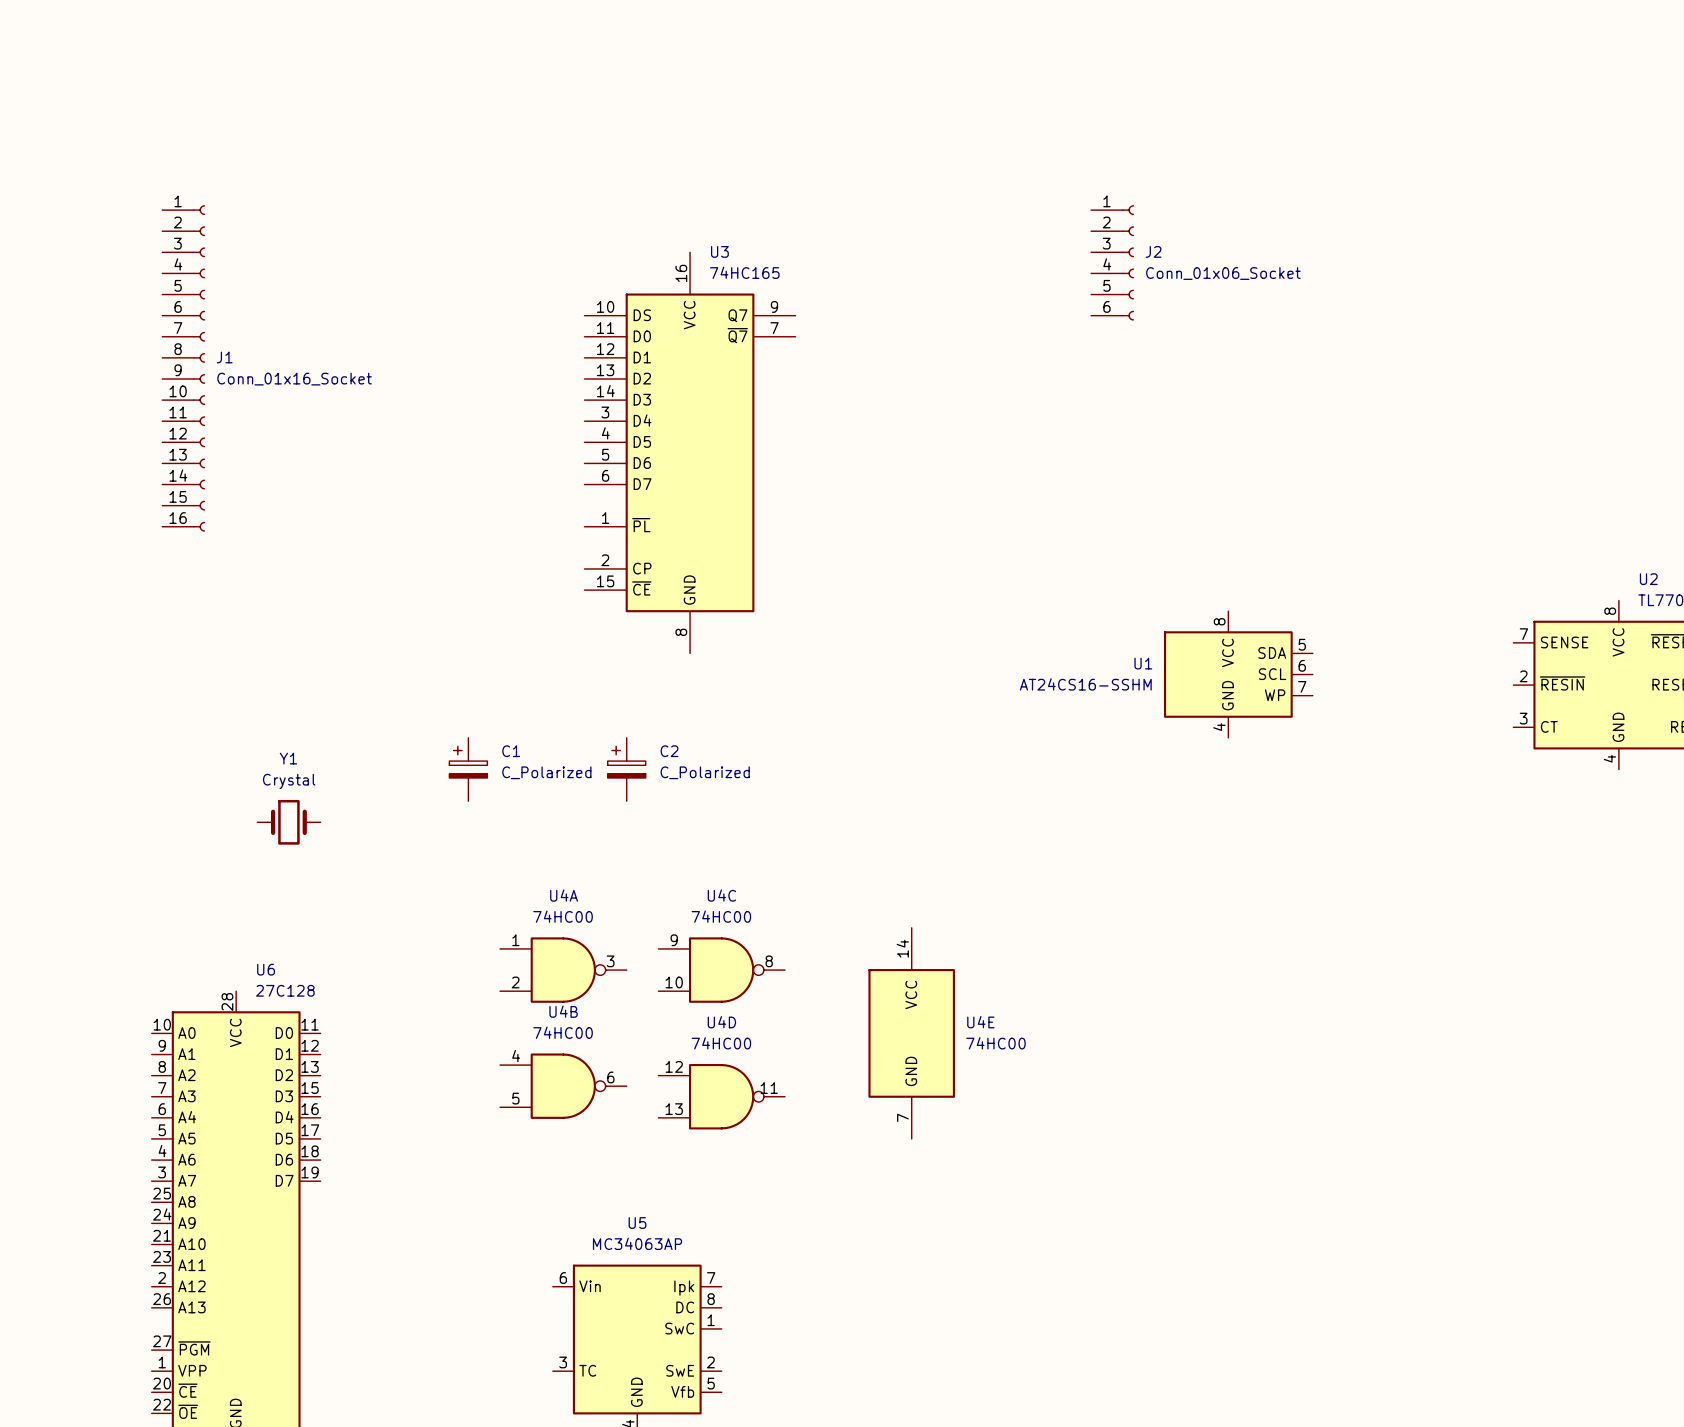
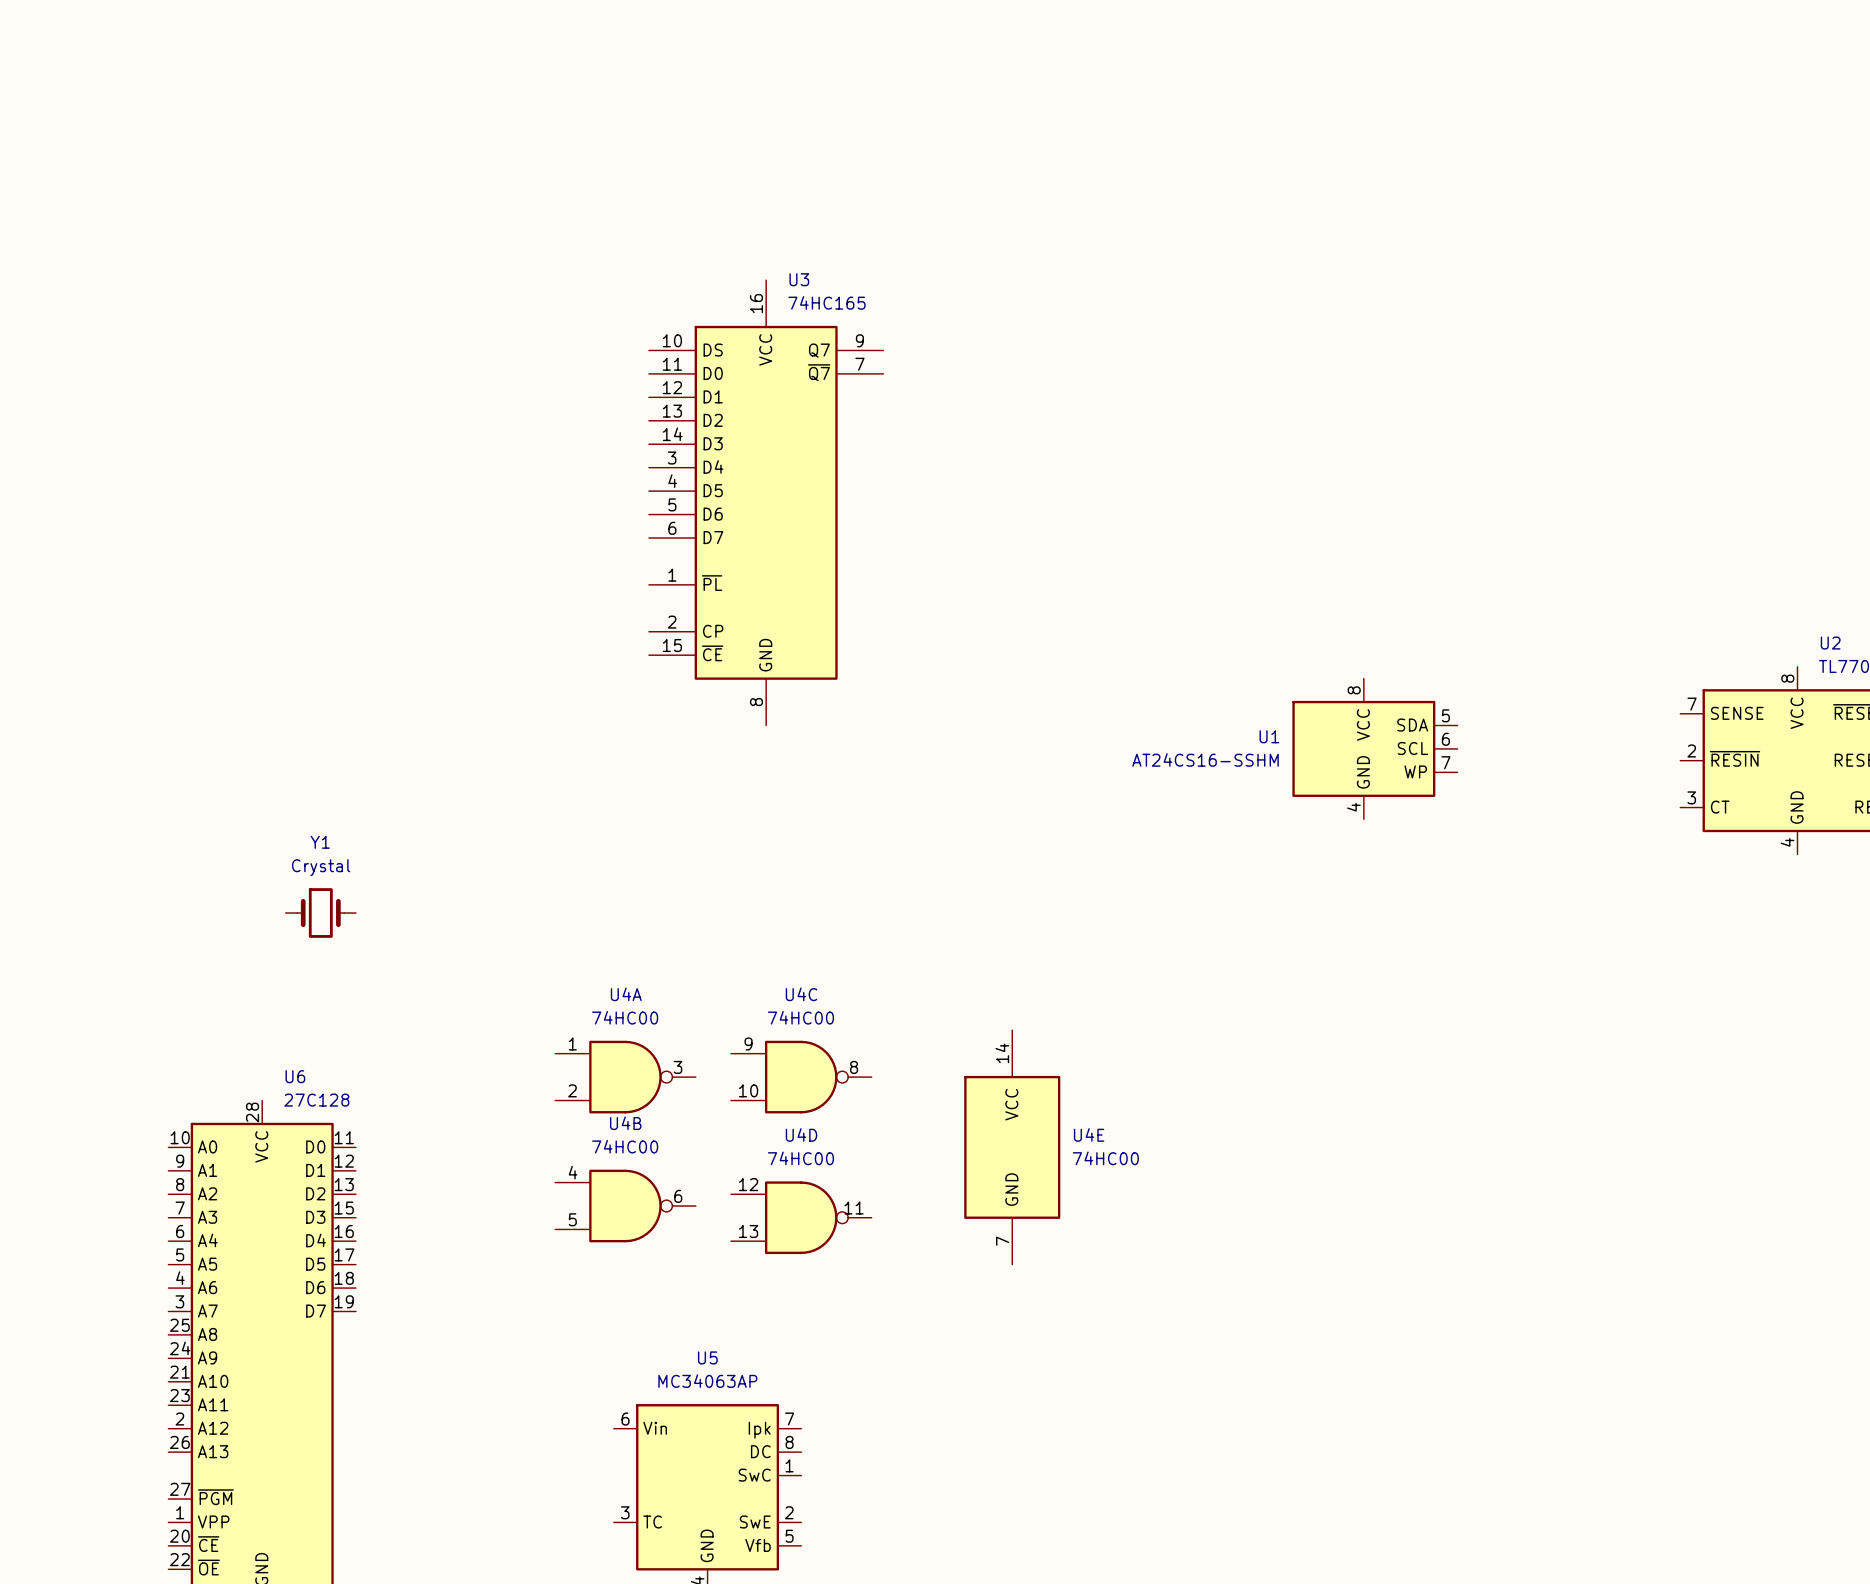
J2: Conn_01x06_Socket (1112, 262) -> none
J1: Conn_01x16_Socket (183, 368) -> none
C1: C_Polarized (468, 769) -> none
C2: C_Polarized (626, 769) -> none

